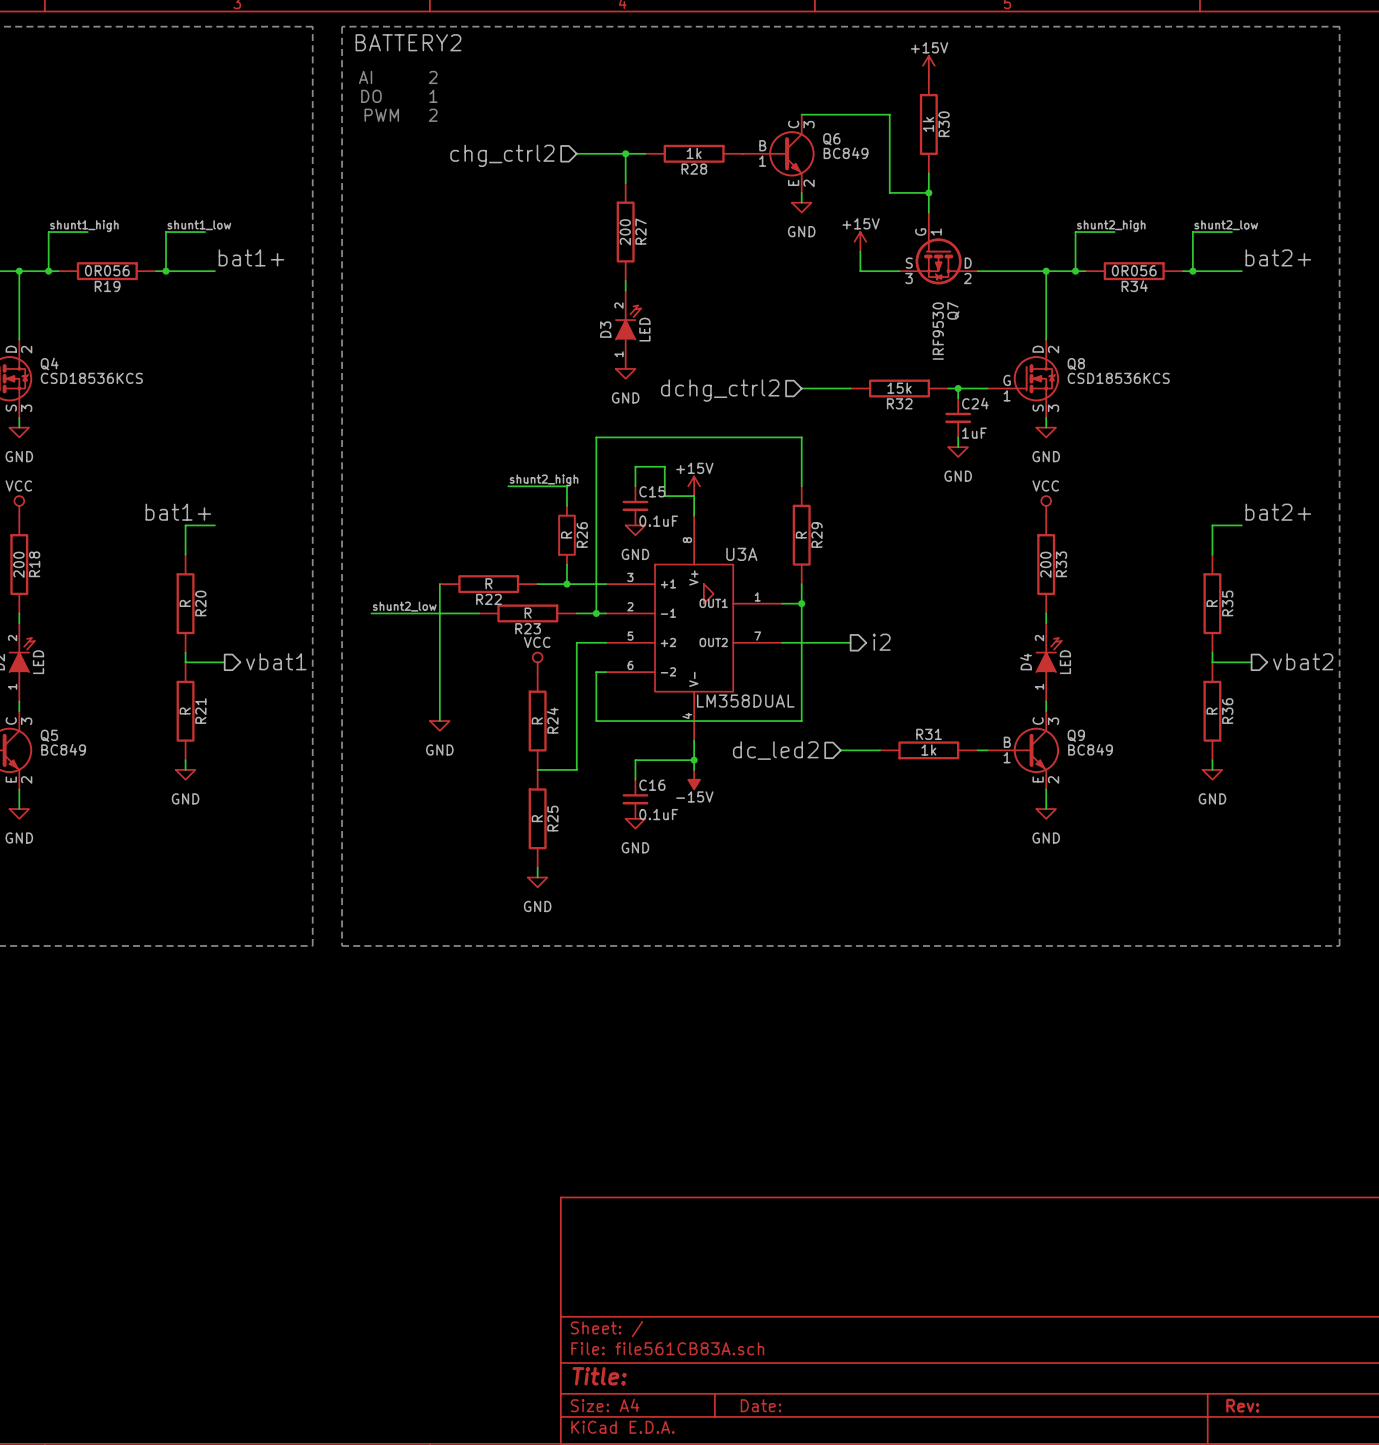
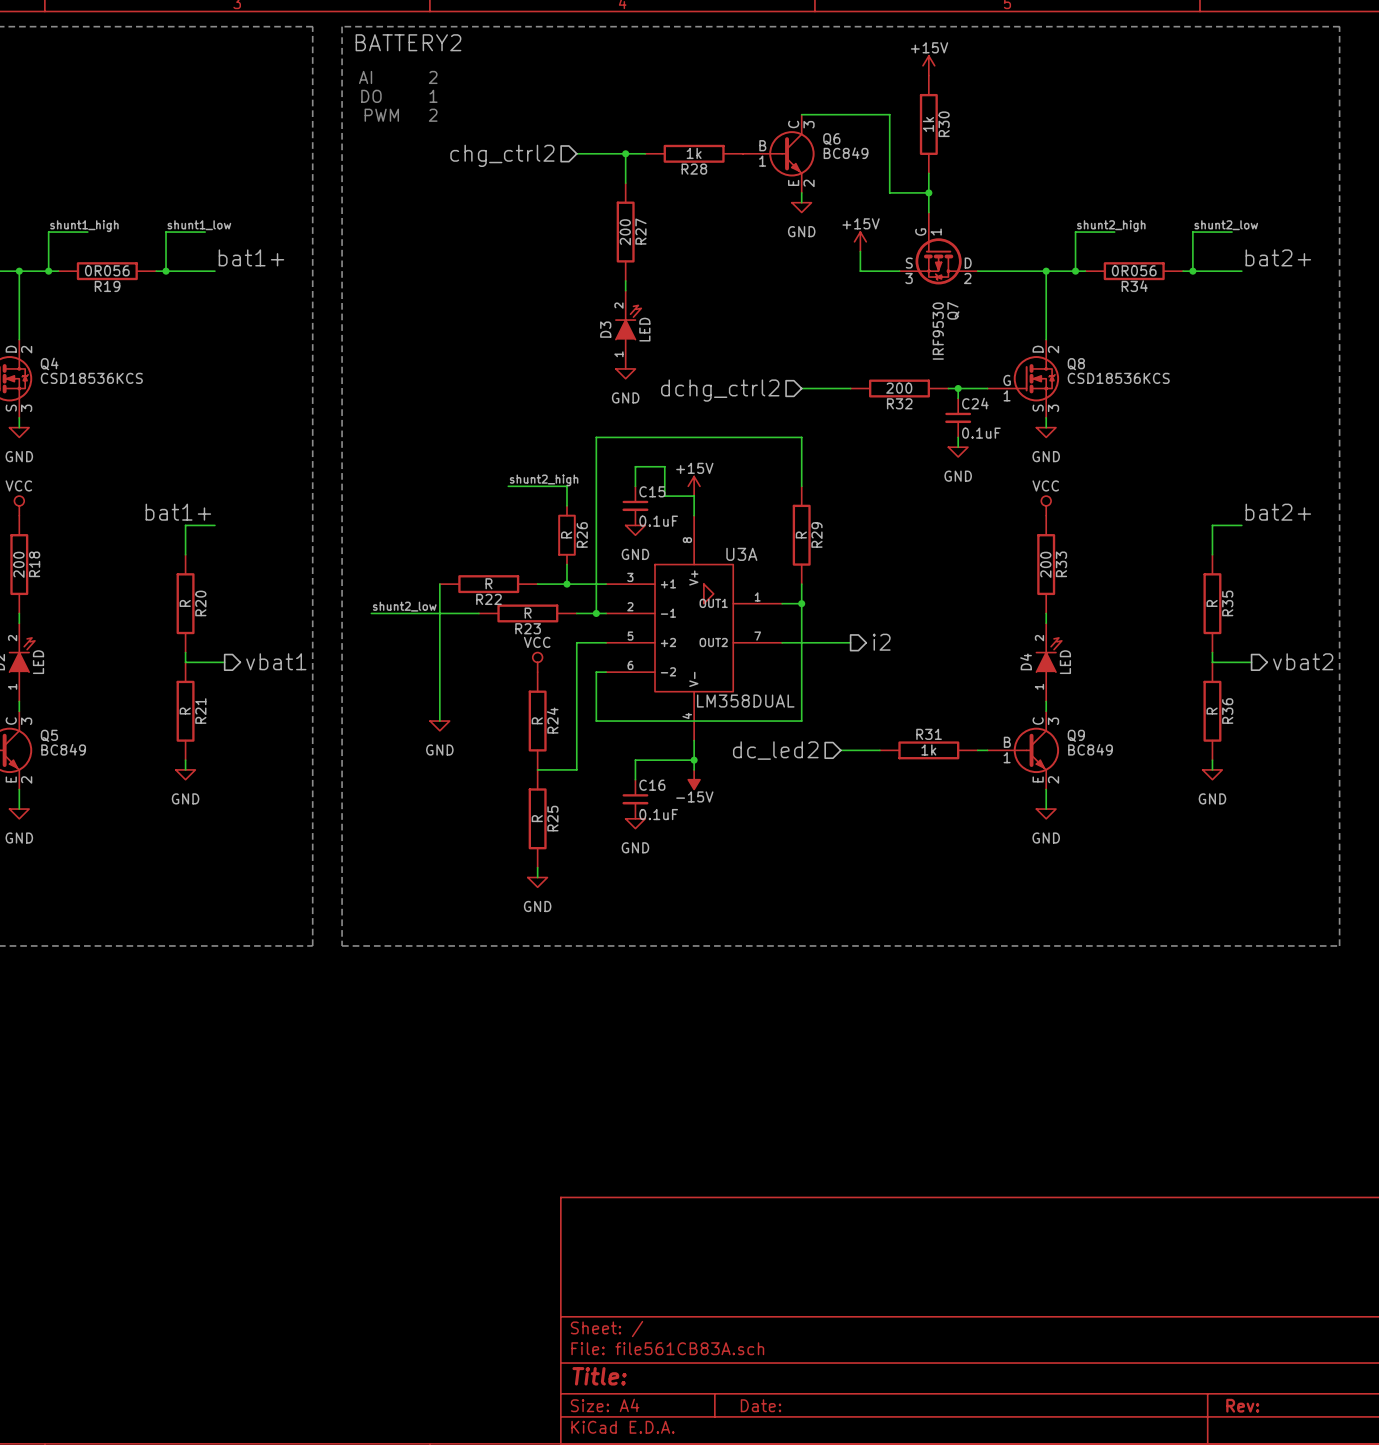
R32 value: 15k (899, 388) -> 200 (899, 388)
C24 value: 1uF (974, 433) -> 0.1uF (981, 433)

